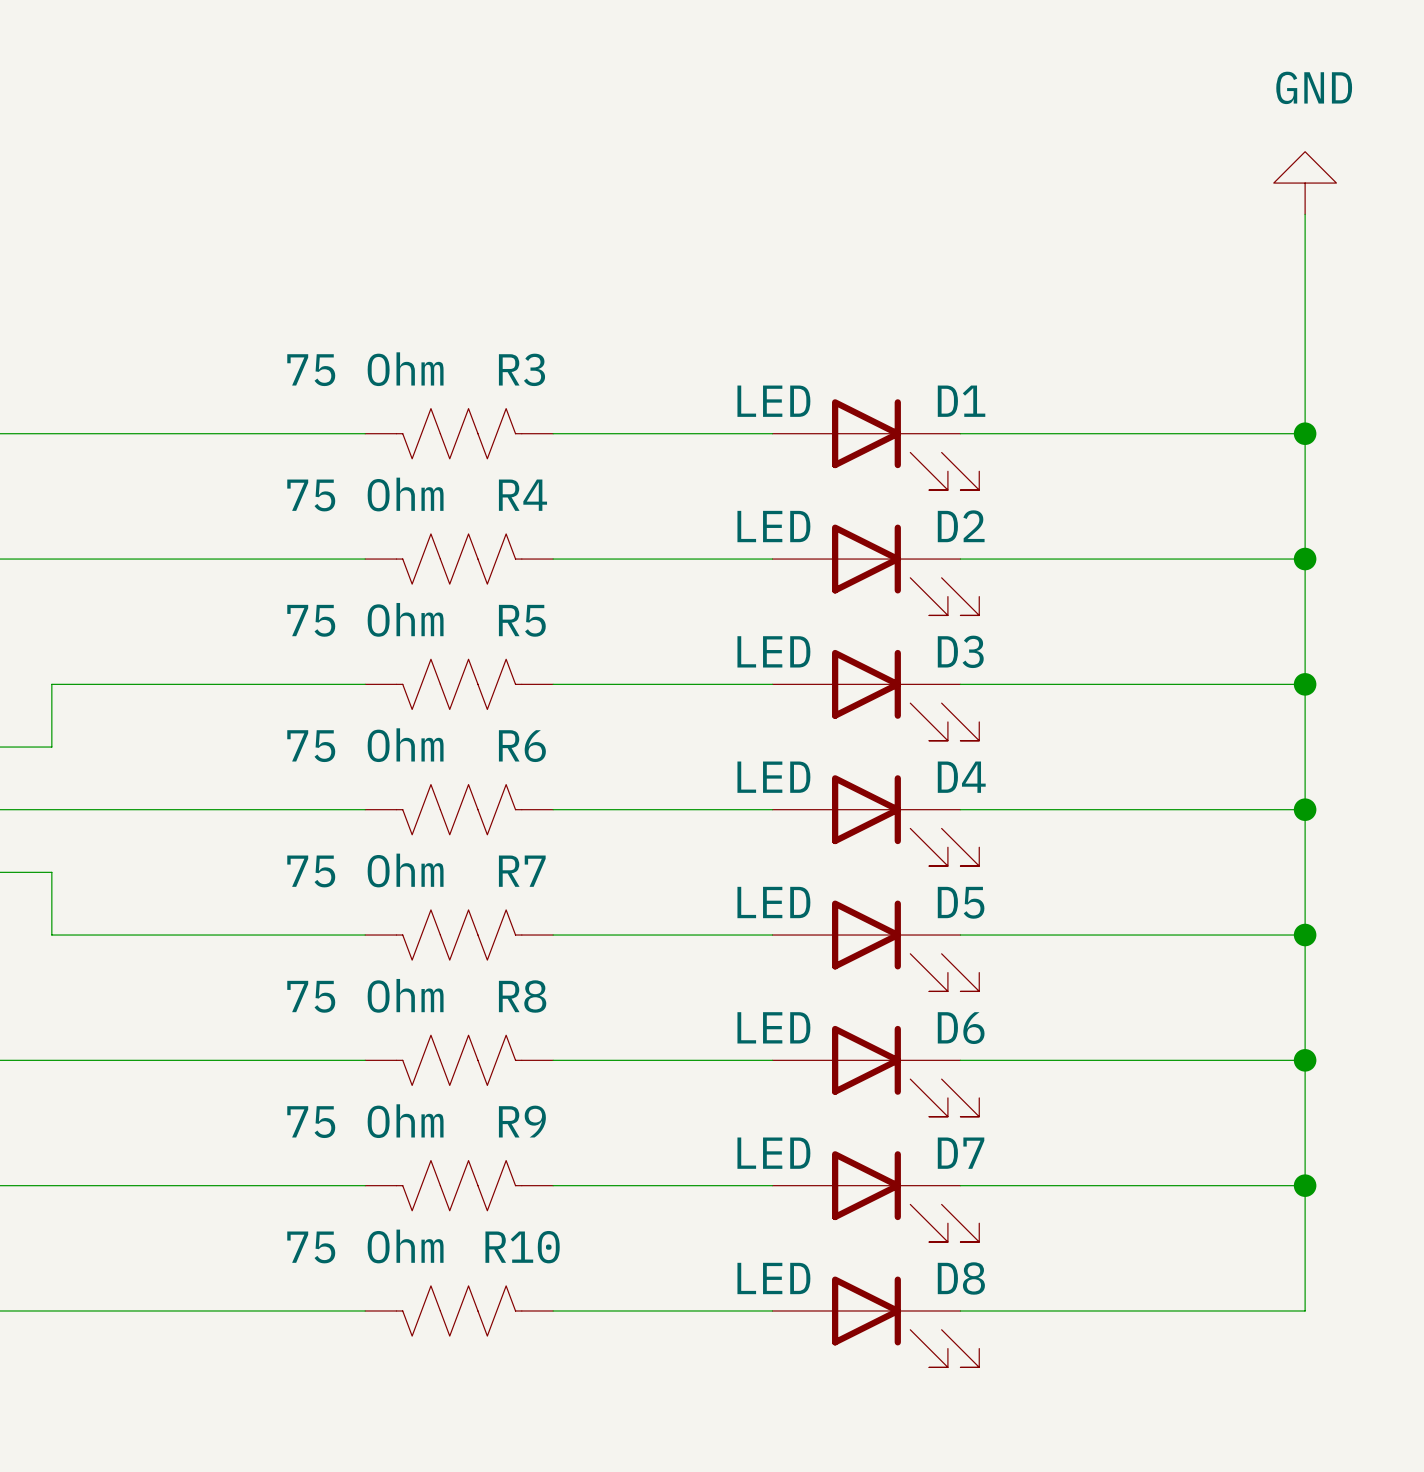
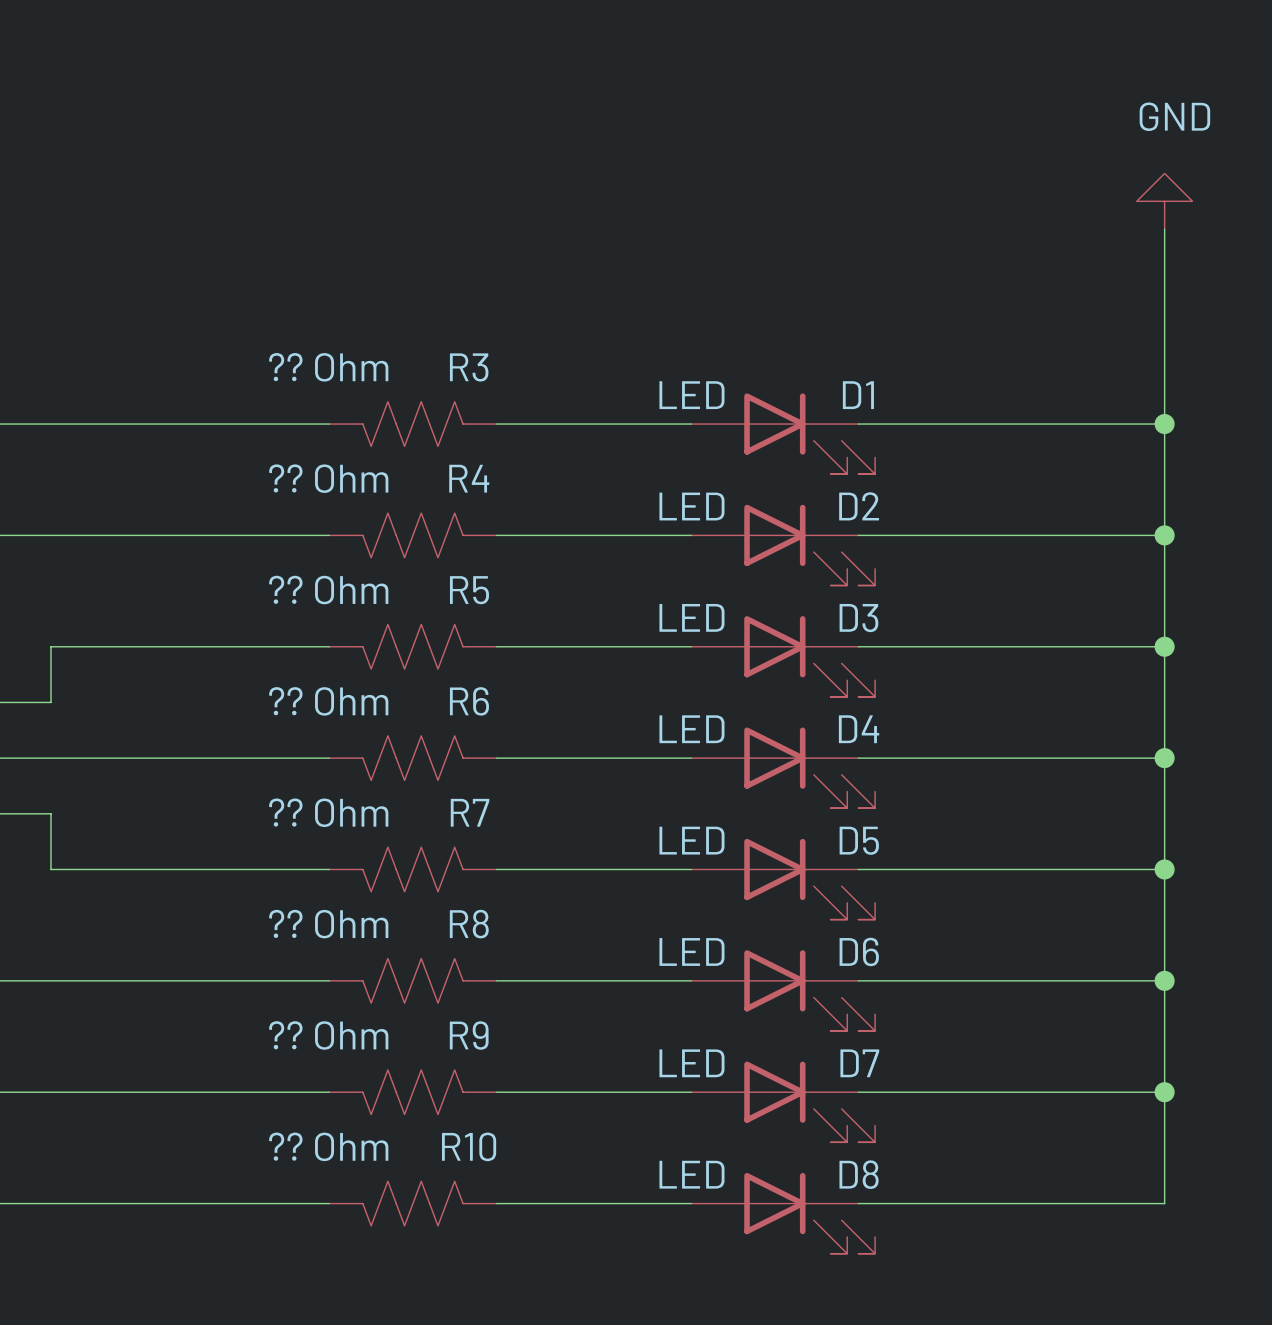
R3 value: 75 Ohm (365, 369) -> ?? Ohm (328, 367)
R4 value: 75 Ohm (365, 494) -> ?? Ohm (328, 478)
R5 value: 75 Ohm (365, 619) -> ?? Ohm (328, 590)
R6 value: 75 Ohm (365, 745) -> ?? Ohm (328, 701)
R7 value: 75 Ohm (365, 870) -> ?? Ohm (328, 812)
R8 value: 75 Ohm (365, 995) -> ?? Ohm (328, 924)
R9 value: 75 Ohm (365, 1121) -> ?? Ohm (328, 1035)
R10 value: 75 Ohm (365, 1246) -> ?? Ohm (328, 1146)

